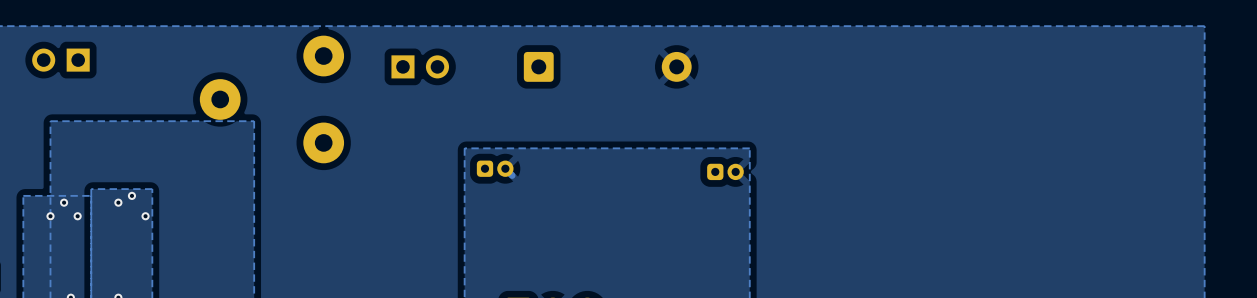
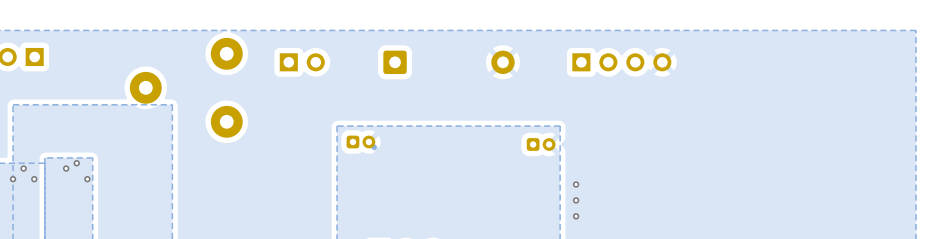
part: none -> (621, 62)
via: none -> (576, 184)
via: none -> (576, 200)
via: none -> (576, 216)

